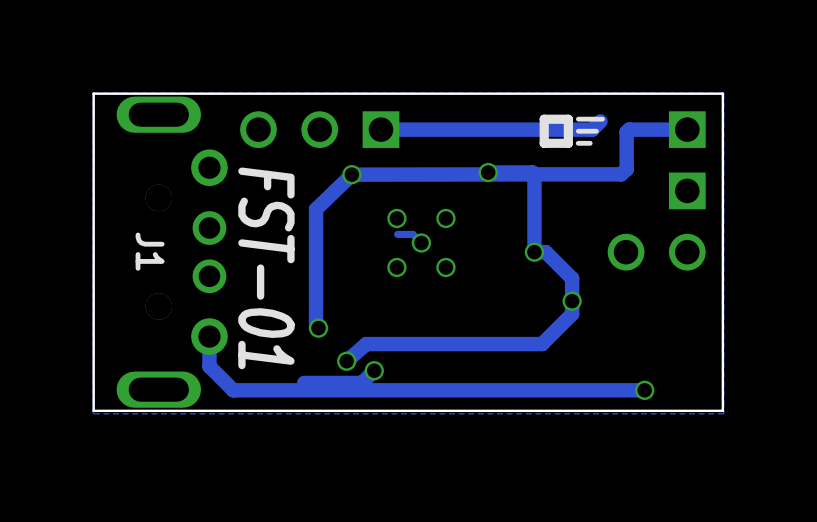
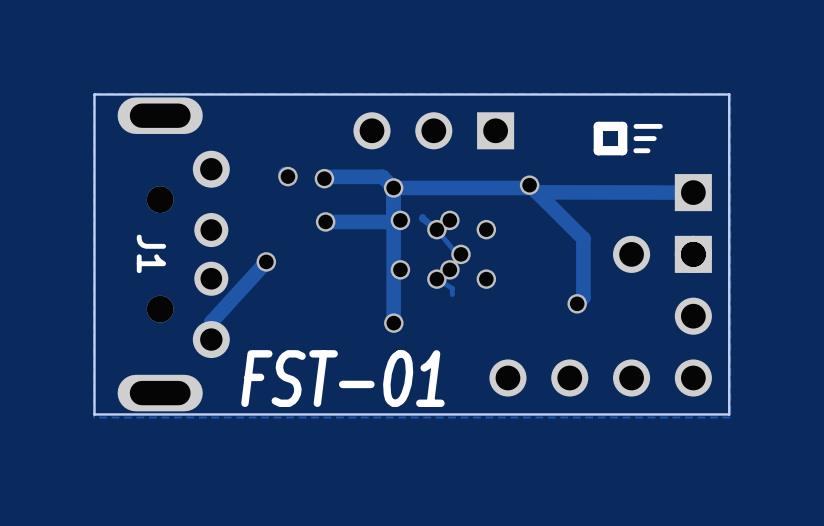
line: (602, 119) (578, 119) -> (660, 126) (636, 126)
track: (600, 121) (592, 129) (381, 129) -> none
part position: (319, 129) -> (433, 130)
track: (687, 129) (629, 129) (626, 132) (626, 169) (621, 174) (351, 174) (316, 209) (316, 326) (318, 328) -> none
line: (596, 131) (578, 131) -> (654, 138) (635, 138)
line: (544, 143) (568, 143) (568, 119) (544, 119) (544, 143) -> (598, 150) (622, 150) (622, 126) (598, 126) (598, 150)
line: (590, 143) (578, 143) -> (647, 150) (635, 150)
part: (687, 160) -> none
track: (488, 172) (532, 172) (534, 174) (534, 252) -> none
via: (488, 172) -> none
via: (351, 174) -> none
via: none -> (287, 176)
track: none -> (324, 178) (326, 176) (382, 176) (393, 187)
via: none -> (324, 178)
track: none -> (529, 185) (583, 238) (583, 297) (580, 300)
track: none -> (529, 185) (526, 187) (393, 187)
track: none -> (529, 185) (537, 192) (693, 192)
via: none -> (529, 185)
track: none -> (393, 187) (393, 322)
via: none -> (393, 187)
track: none -> (422, 217) (436, 229) (457, 254)
via: none -> (325, 221)
track: none -> (393, 221) (325, 221)
via: none -> (486, 229)
track: (397, 234) (412, 234) (421, 242) -> none
via position: (421, 242) -> (436, 229)
via: none -> (460, 254)
track: (534, 252) (545, 252) (572, 278) (572, 314) (542, 344) (366, 344) (346, 361) -> none
via: (534, 252) -> none
via: none -> (266, 261)
text rotation: 0° (266, 268) -> 90° counterclockwise (342, 378)
track: none -> (436, 279) (452, 288) (452, 294)
via: none -> (436, 279)
via: none -> (486, 279)
part: none -> (693, 285)
via: none -> (393, 323)
via: (318, 328) -> none
track: (209, 336) (209, 366) (233, 390) (644, 390) -> (211, 339) (211, 322) (266, 261)
via: (346, 361) -> none
track: (374, 370) (362, 382) (304, 382) -> none
via: (374, 370) -> none
part: none -> (569, 377)
via: (644, 390) -> none

